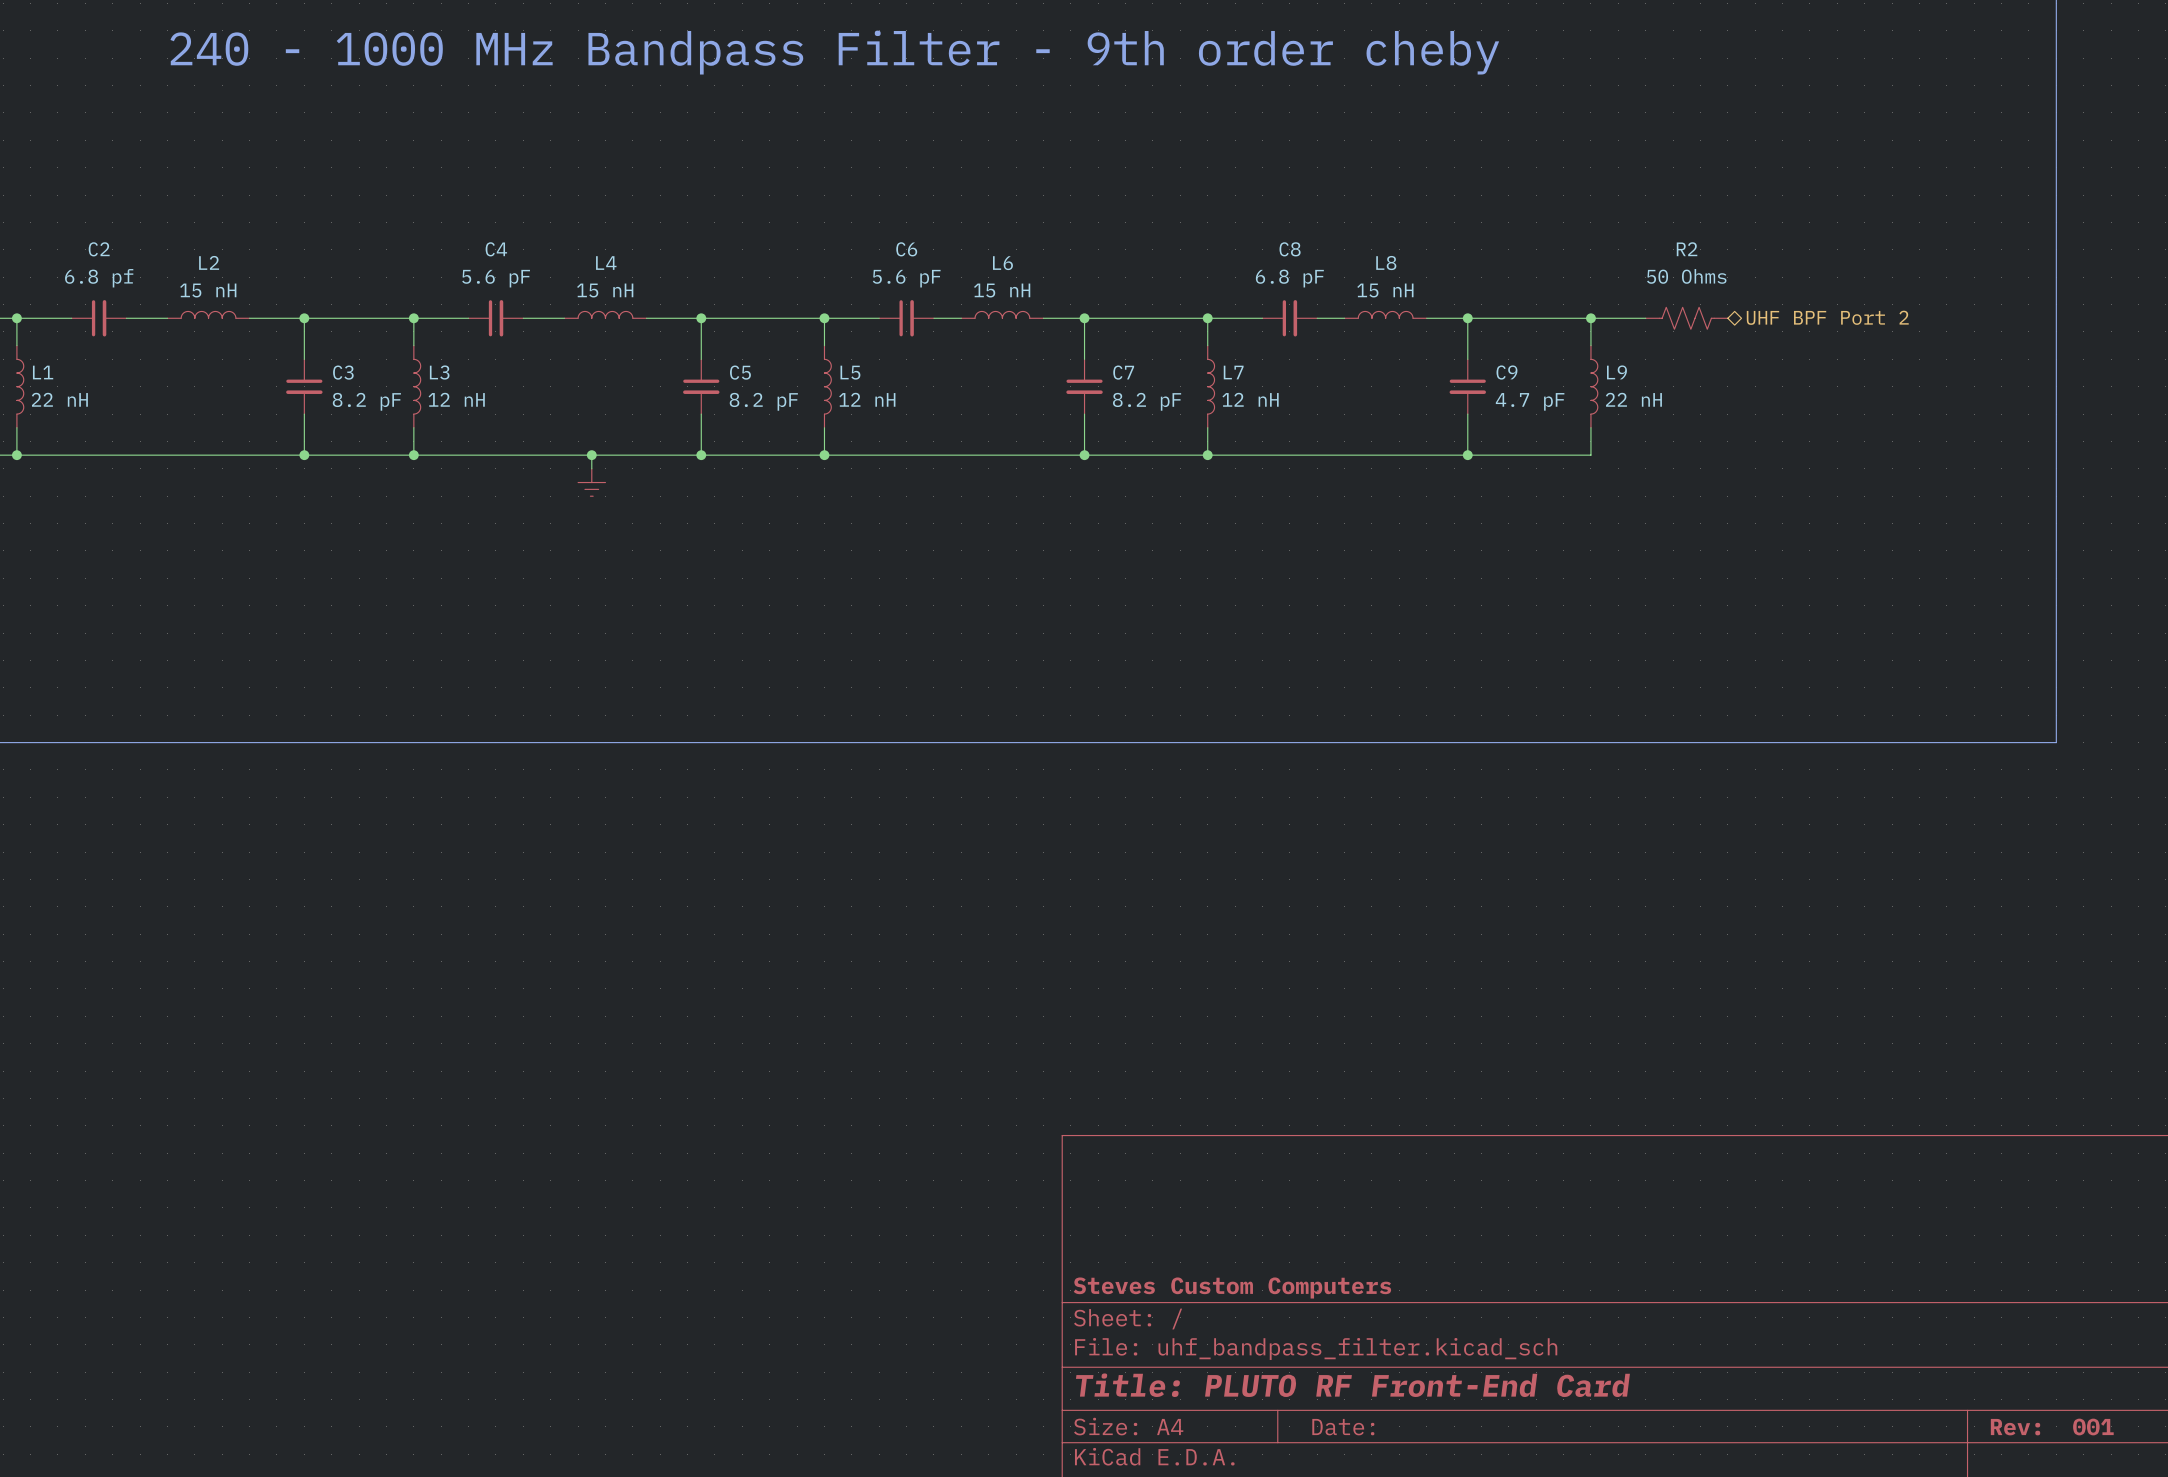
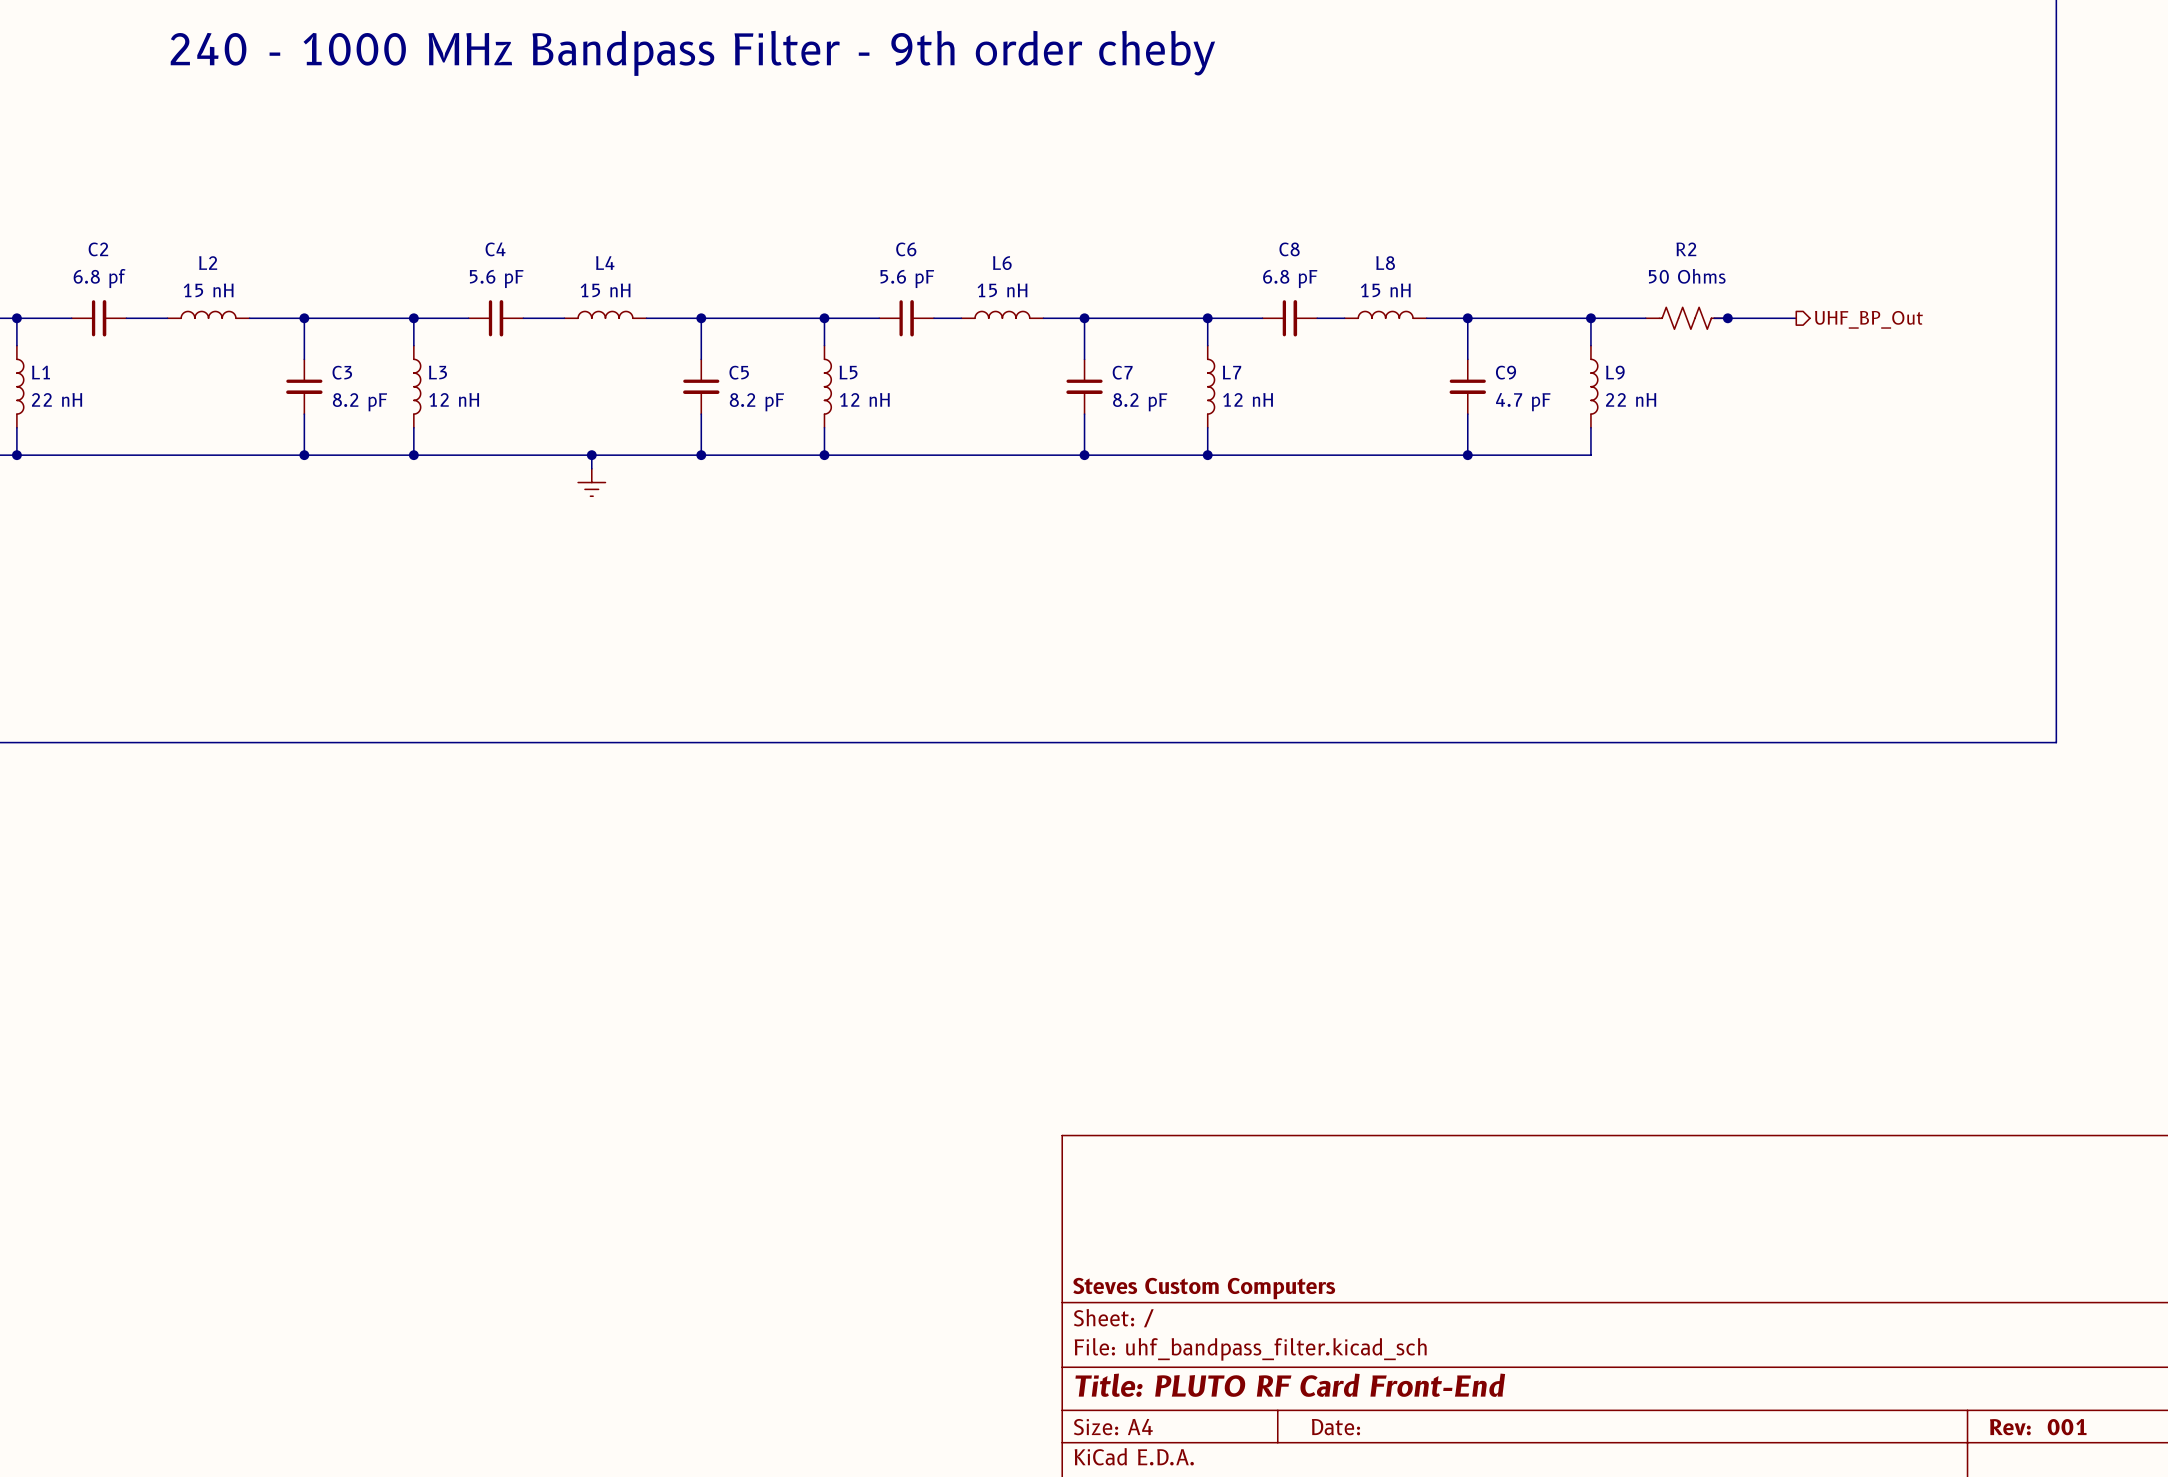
hierarchical label: UHF BPF Port 2 (1827, 317) -> none
wire: none -> (1714, 318) (1796, 318)
junction: none -> (1727, 318)
hierarchical label: none -> UHF_BP_Out (1868, 319)
title block: Title: PLUTO RF Front-End Card (1352, 1385) -> Title: PLUTO RF Card Front-End (1290, 1385)

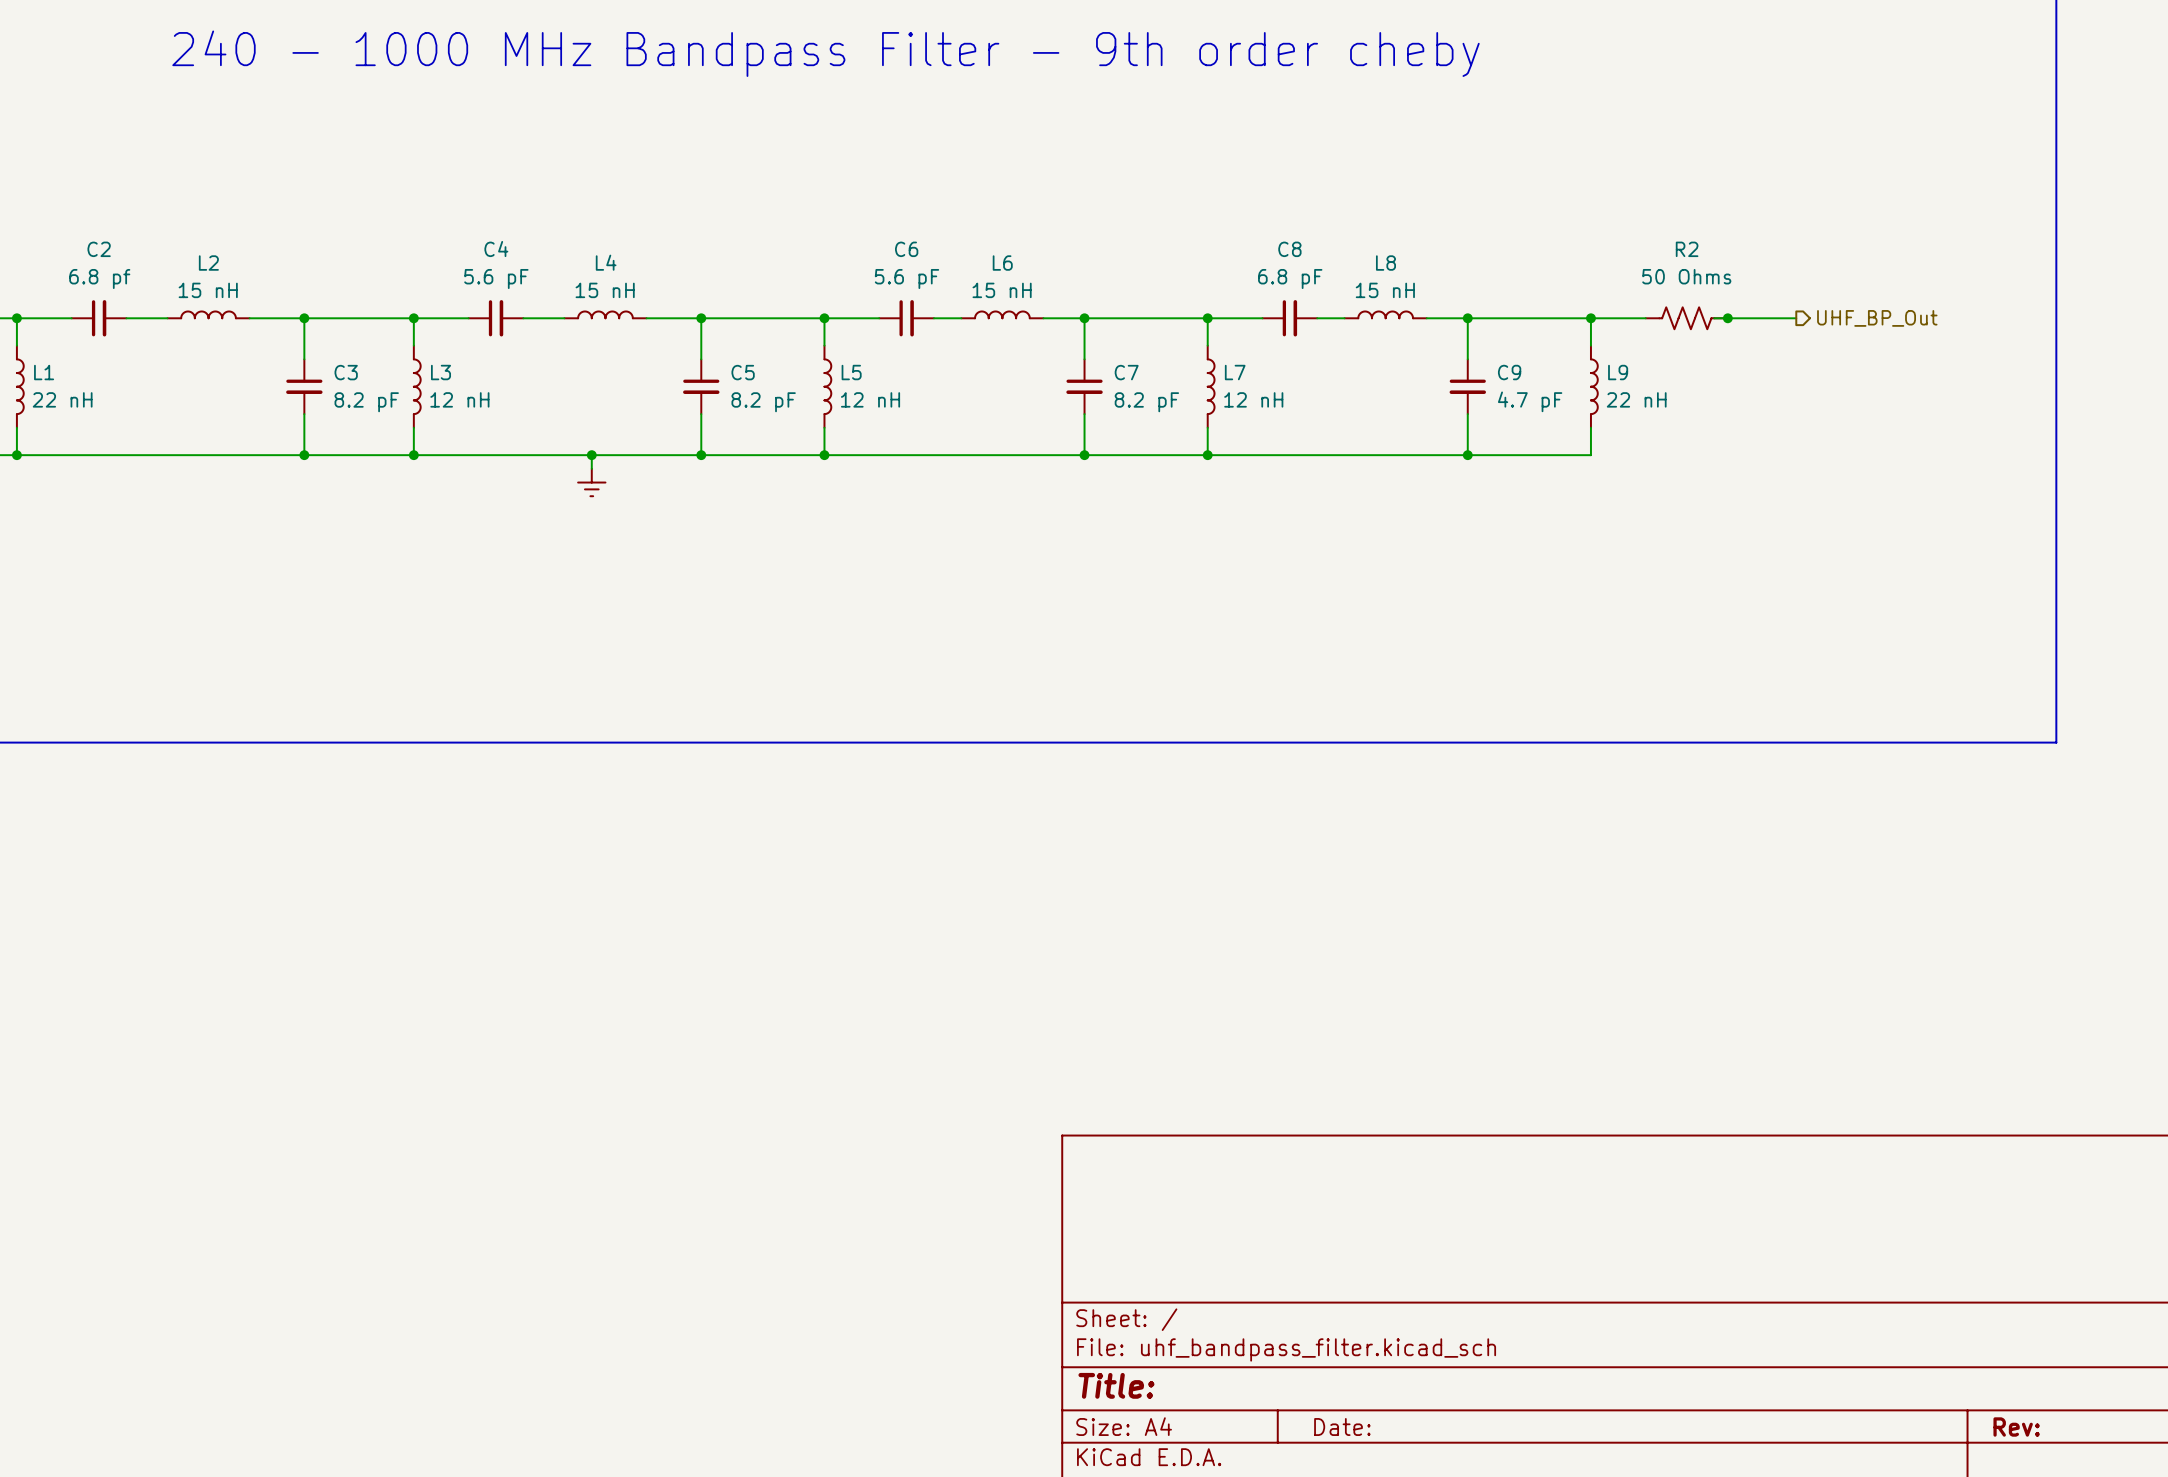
title block: Steves Custom Computers (1204, 1288) -> none
title block: Title: PLUTO RF Card Front-End (1290, 1385) -> Title: (1116, 1385)
title block: Rev: 001 (2038, 1427) -> Rev: (2016, 1427)

